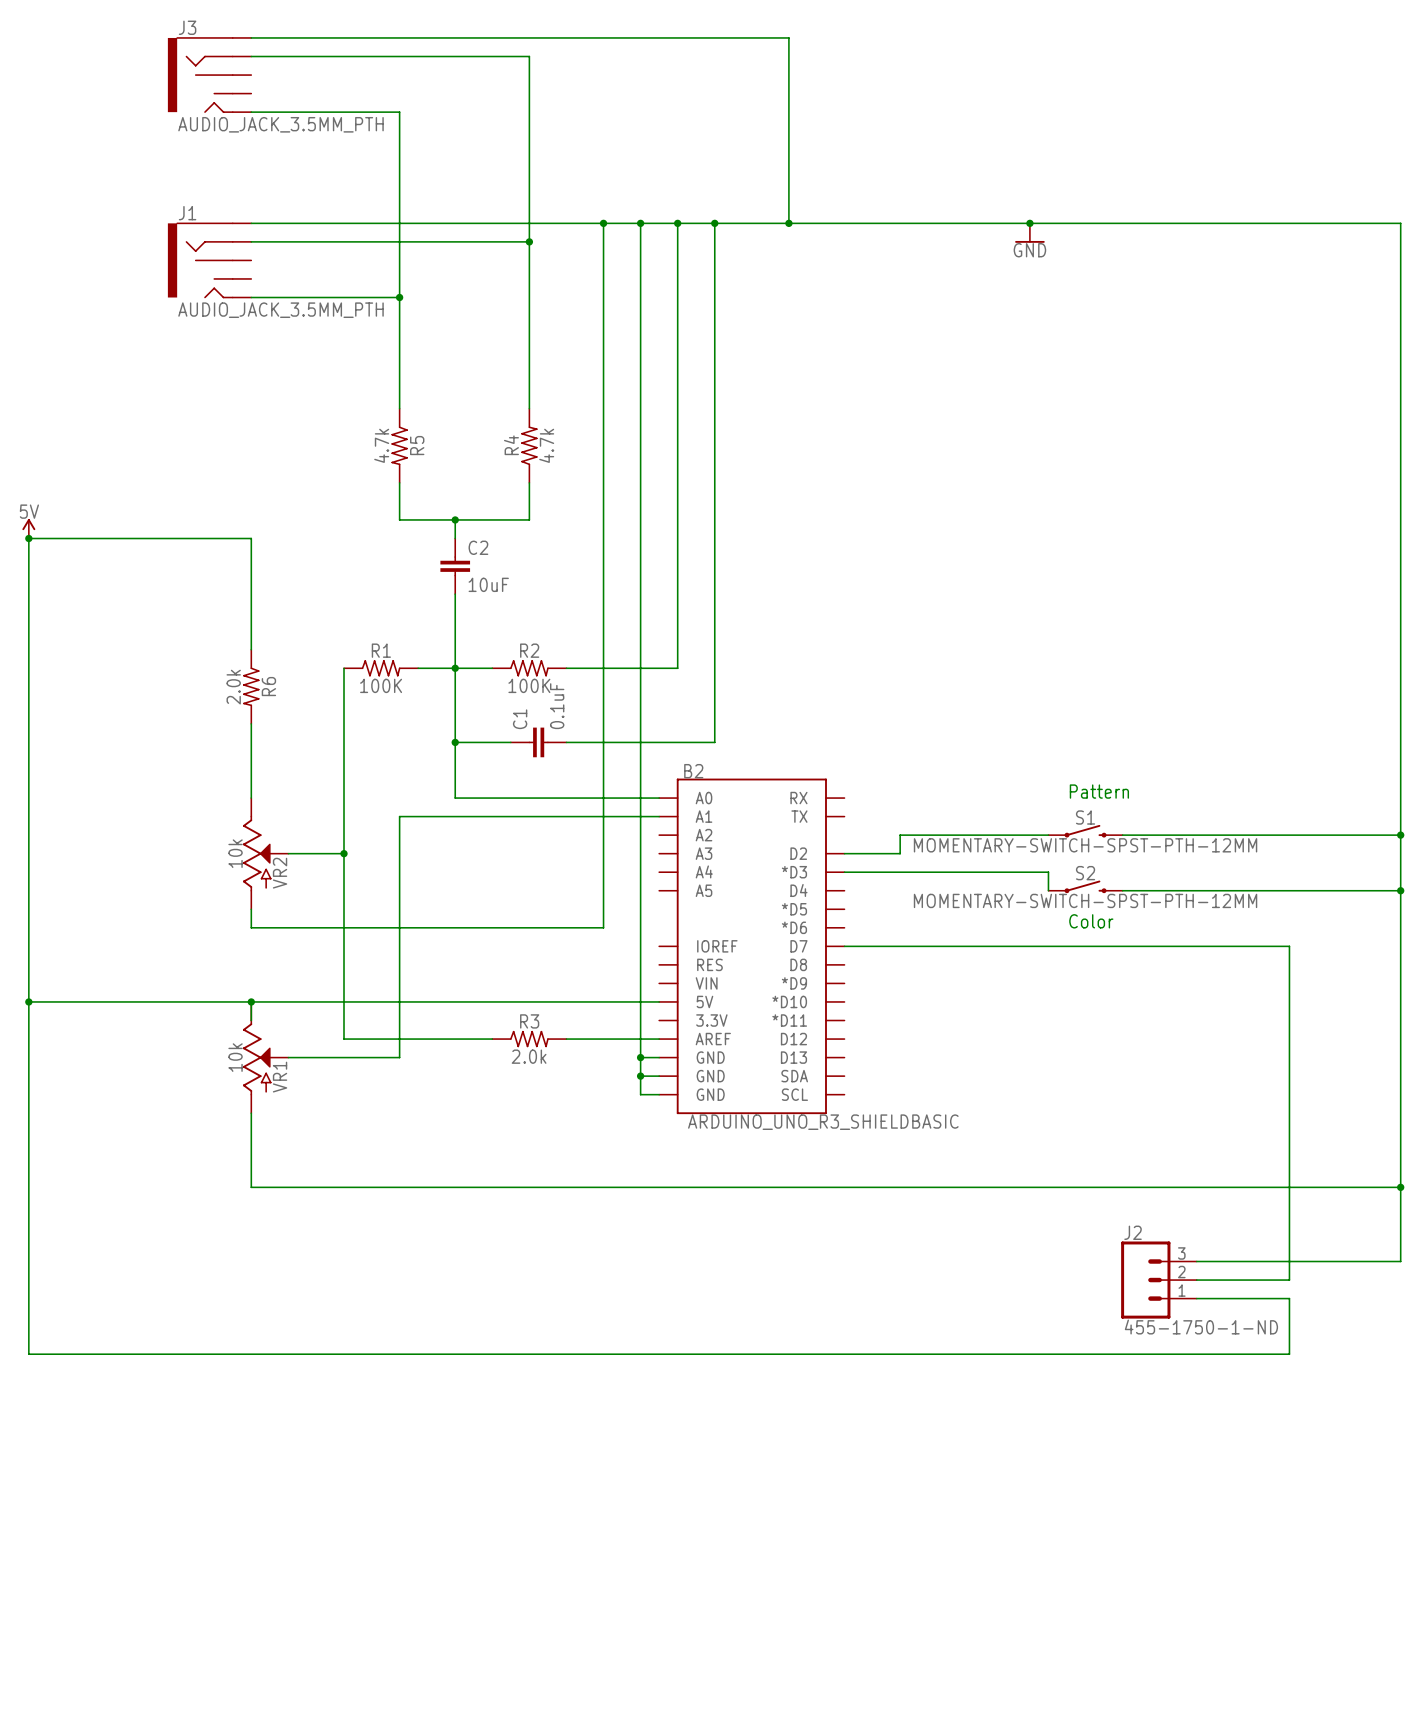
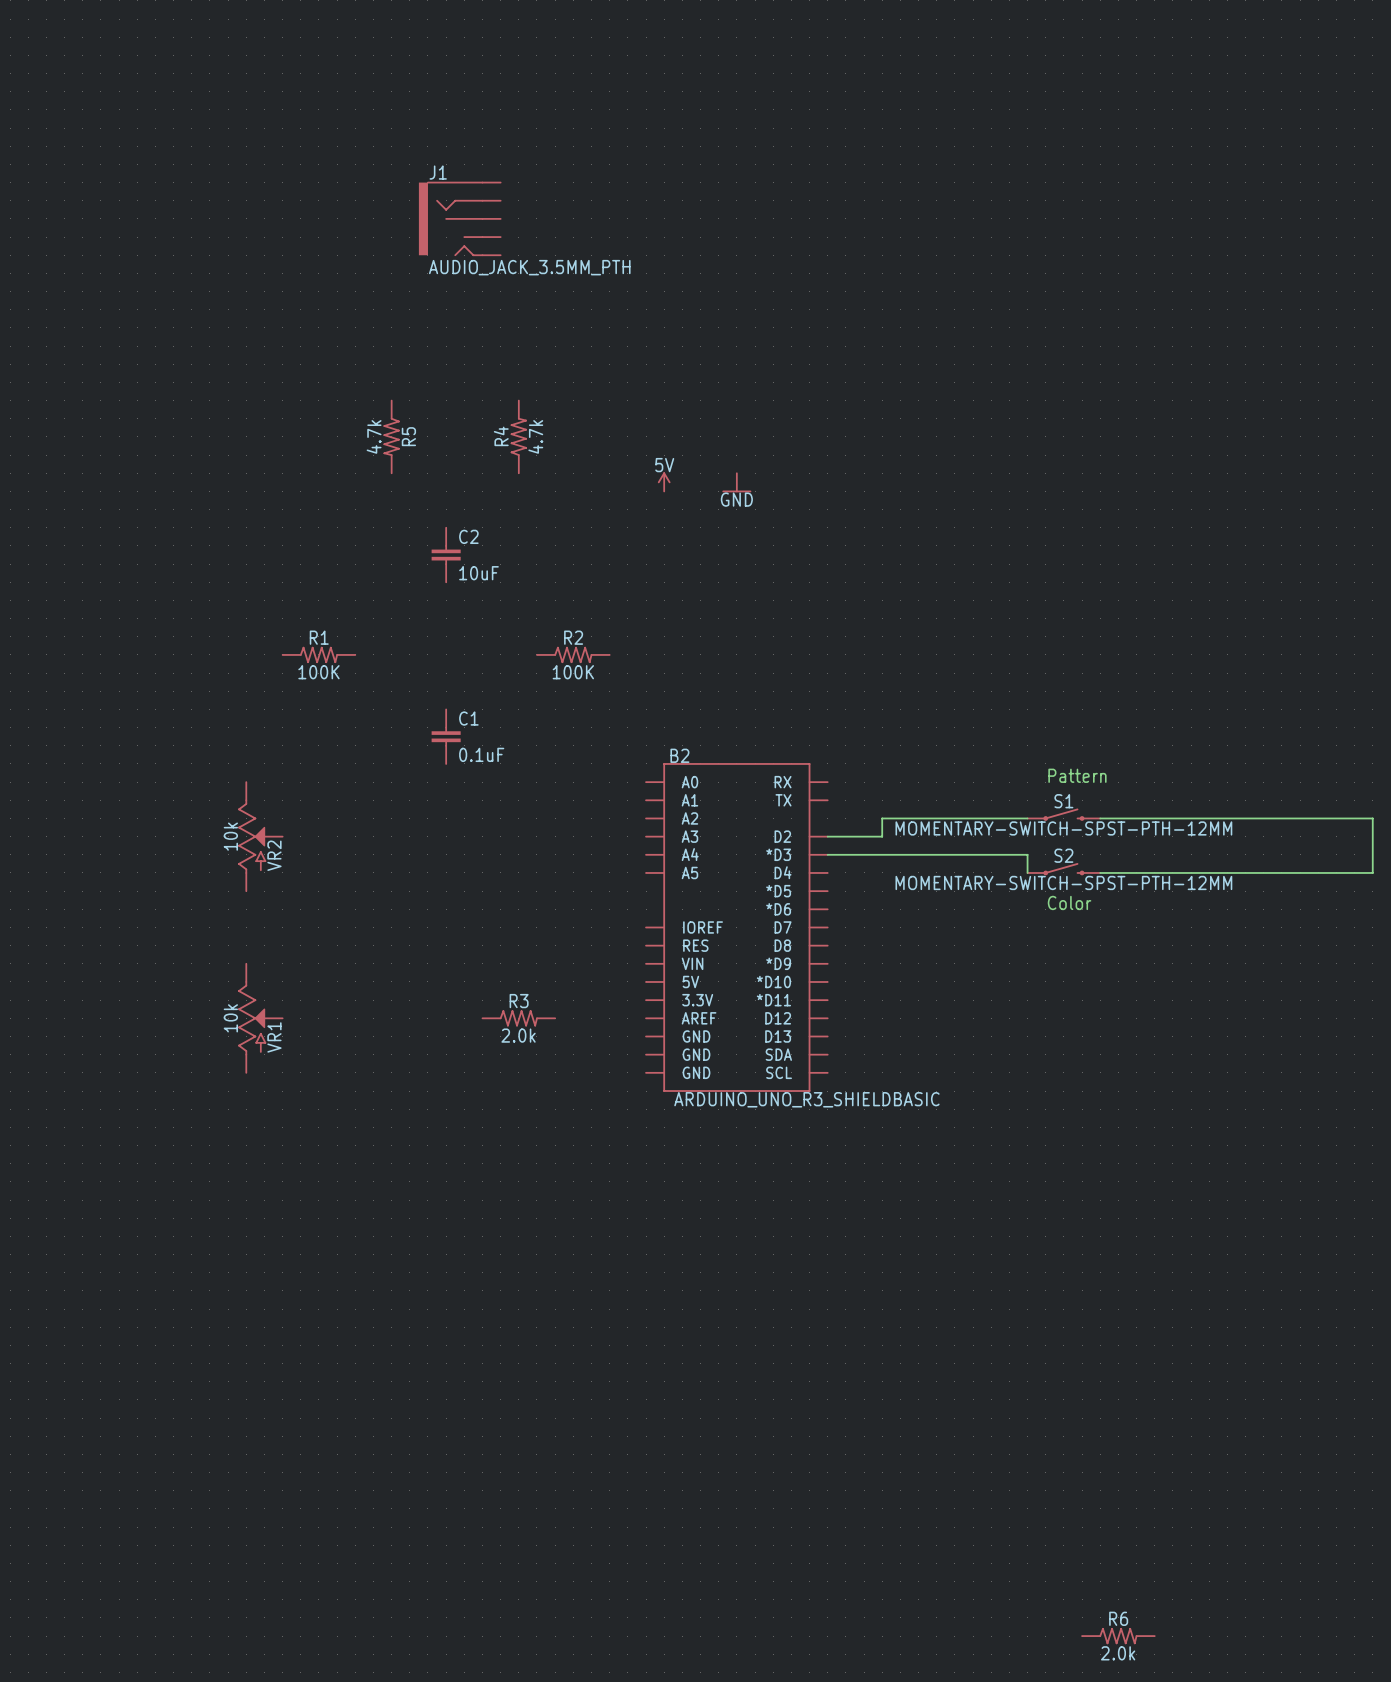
wire: (251, 37) (788, 37) (788, 223) -> none
wire: (251, 56) (529, 56) (529, 408) -> none
J3: AUDIO_JACK_3.5MM_PTH (209, 75) -> none
wire: (251, 112) (399, 112) (399, 408) -> none
wire: (251, 223) (1400, 223) (1400, 835) -> none
wire: (603, 223) (603, 927) (251, 927) (251, 909) -> none
junction: (603, 223) -> none
wire: (640, 223) (640, 1094) (659, 1094) -> none
junction: (640, 223) -> none
wire: (677, 223) (677, 668) (566, 668) -> none
junction: (677, 223) -> none
wire: (714, 223) (714, 742) (566, 742) -> none
junction: (714, 223) -> none
junction: (788, 223) -> none
junction: (1029, 223) -> none
power symbol: GND (1029, 233) -> none
wire: (251, 241) (529, 241) -> none
junction: (529, 241) -> none
J1 position: (209, 260) -> (459, 218)
wire: (251, 297) (399, 297) -> none
junction: (399, 297) -> none
wire: (399, 482) (399, 519) (529, 519) (529, 482) -> none
power symbol: none -> 5V (664, 481)
power symbol: none -> GND (736, 482)
wire: (455, 519) (455, 538) -> none
junction: (455, 519) -> none
power symbol: 5V (28, 528) -> none
junction: (28, 538) -> none
wire: (455, 594) (455, 798) (659, 798) -> none
wire: (251, 649) (251, 538) (28, 538) (28, 1354) (1289, 1354) (1289, 1298) (1196, 1298) -> none
wire: (344, 668) (344, 1039) (492, 1039) -> none
R1 position: (381, 668) -> (318, 654)
wire: (418, 668) (492, 668) -> none
junction: (455, 668) -> none
R2 position: (529, 668) -> (573, 654)
R6 rotation: 0° (251, 686) -> 90° counterclockwise (1118, 1636)
R6 position: (251, 686) -> (1118, 1636)
wire: (251, 723) (251, 798) -> none
wire: (455, 742) (510, 742) -> none
junction: (455, 742) -> none
C1 rotation: 0° (538, 742) -> 90° clockwise (446, 736)
C1 position: (538, 742) -> (446, 736)
wire: (659, 816) (399, 816) (399, 1057) (288, 1057) -> none
junction: (1400, 835) -> none
wire: (288, 853) (344, 853) -> none
junction: (344, 853) -> none
wire: (1400, 890) (1400, 1261) (1196, 1261) -> none
junction: (1400, 890) -> none
wire: (844, 946) (1289, 946) (1289, 1280) (1196, 1280) -> none
wire: (28, 1001) (659, 1001) -> none
junction: (28, 1001) -> none
wire: (251, 1001) (251, 1020) -> none
junction: (251, 1001) -> none
wire: (566, 1039) (659, 1039) -> none
VR1 position: (265, 1057) -> (260, 1018)
wire: (640, 1057) (659, 1057) -> none
junction: (640, 1057) -> none
wire: (640, 1076) (659, 1076) -> none
junction: (640, 1076) -> none
wire: (251, 1113) (251, 1187) (1400, 1187) -> none
junction: (1400, 1187) -> none
J2: 455-1750-1-ND (1158, 1280) -> none

